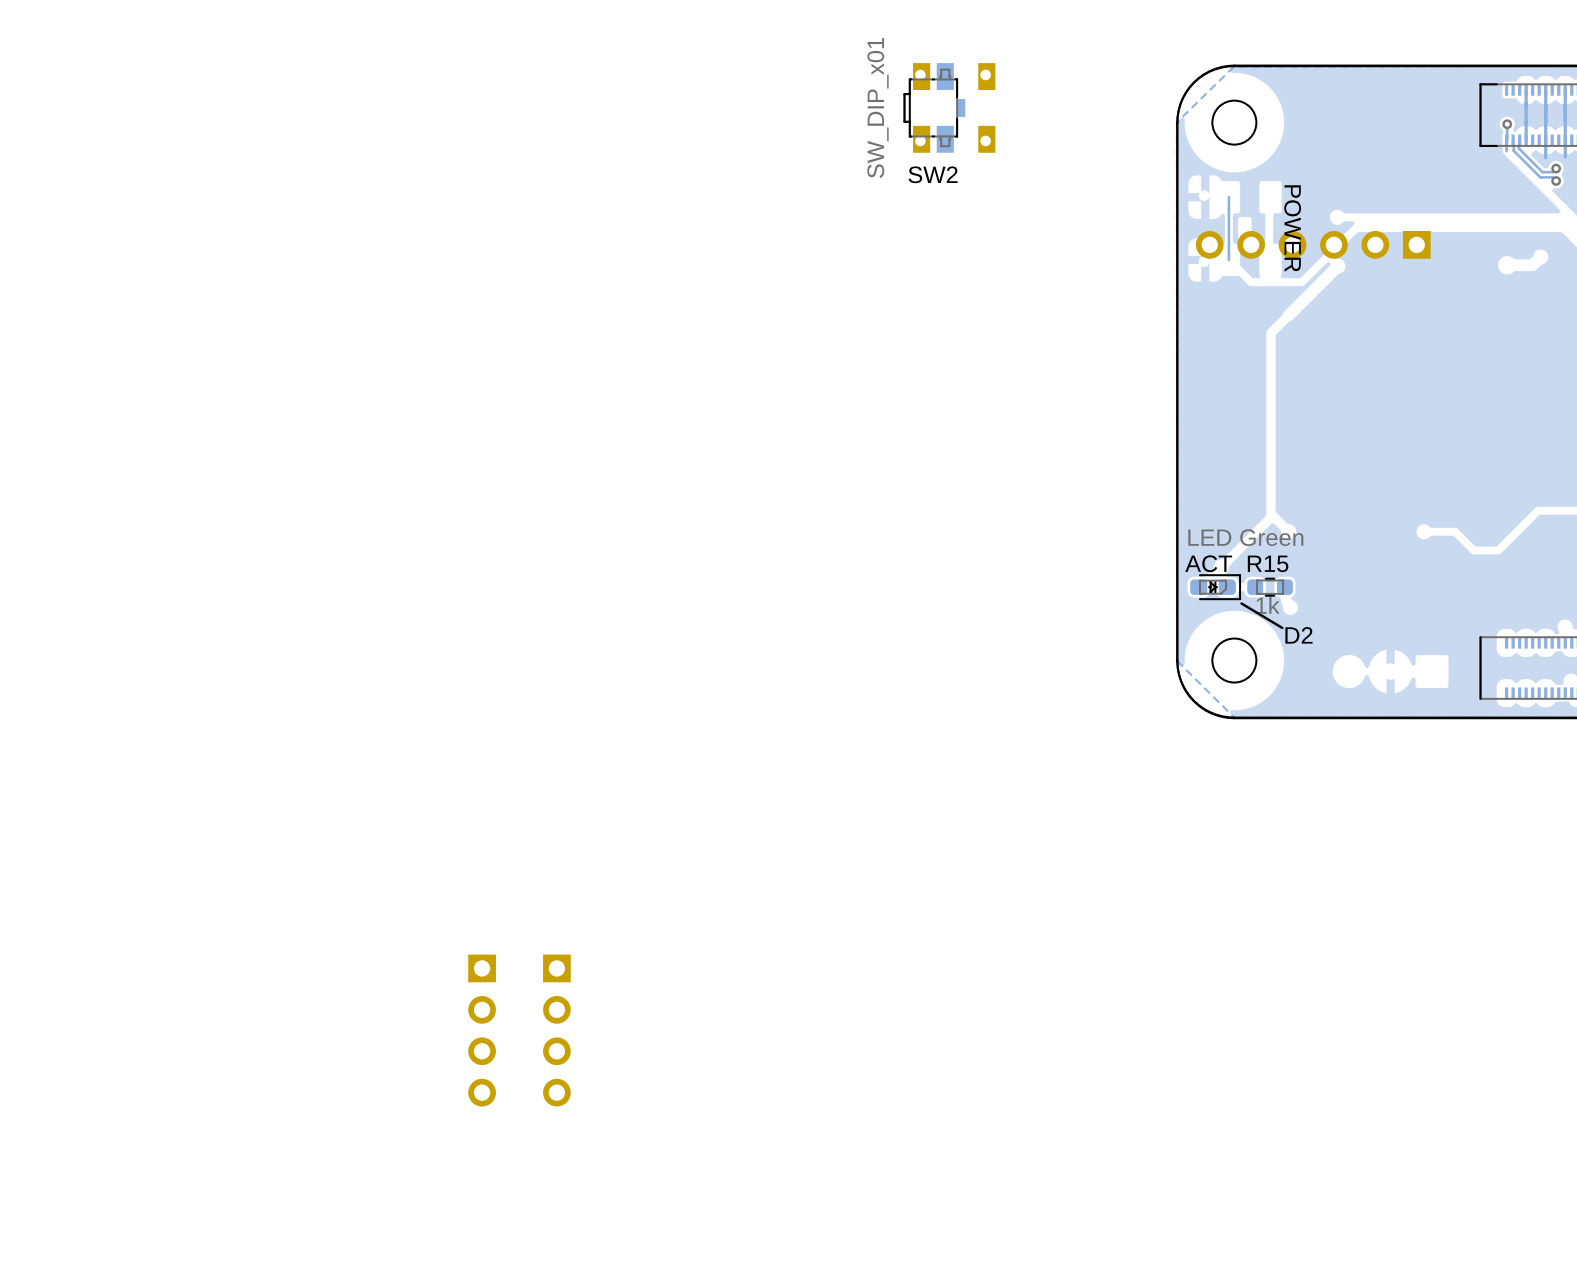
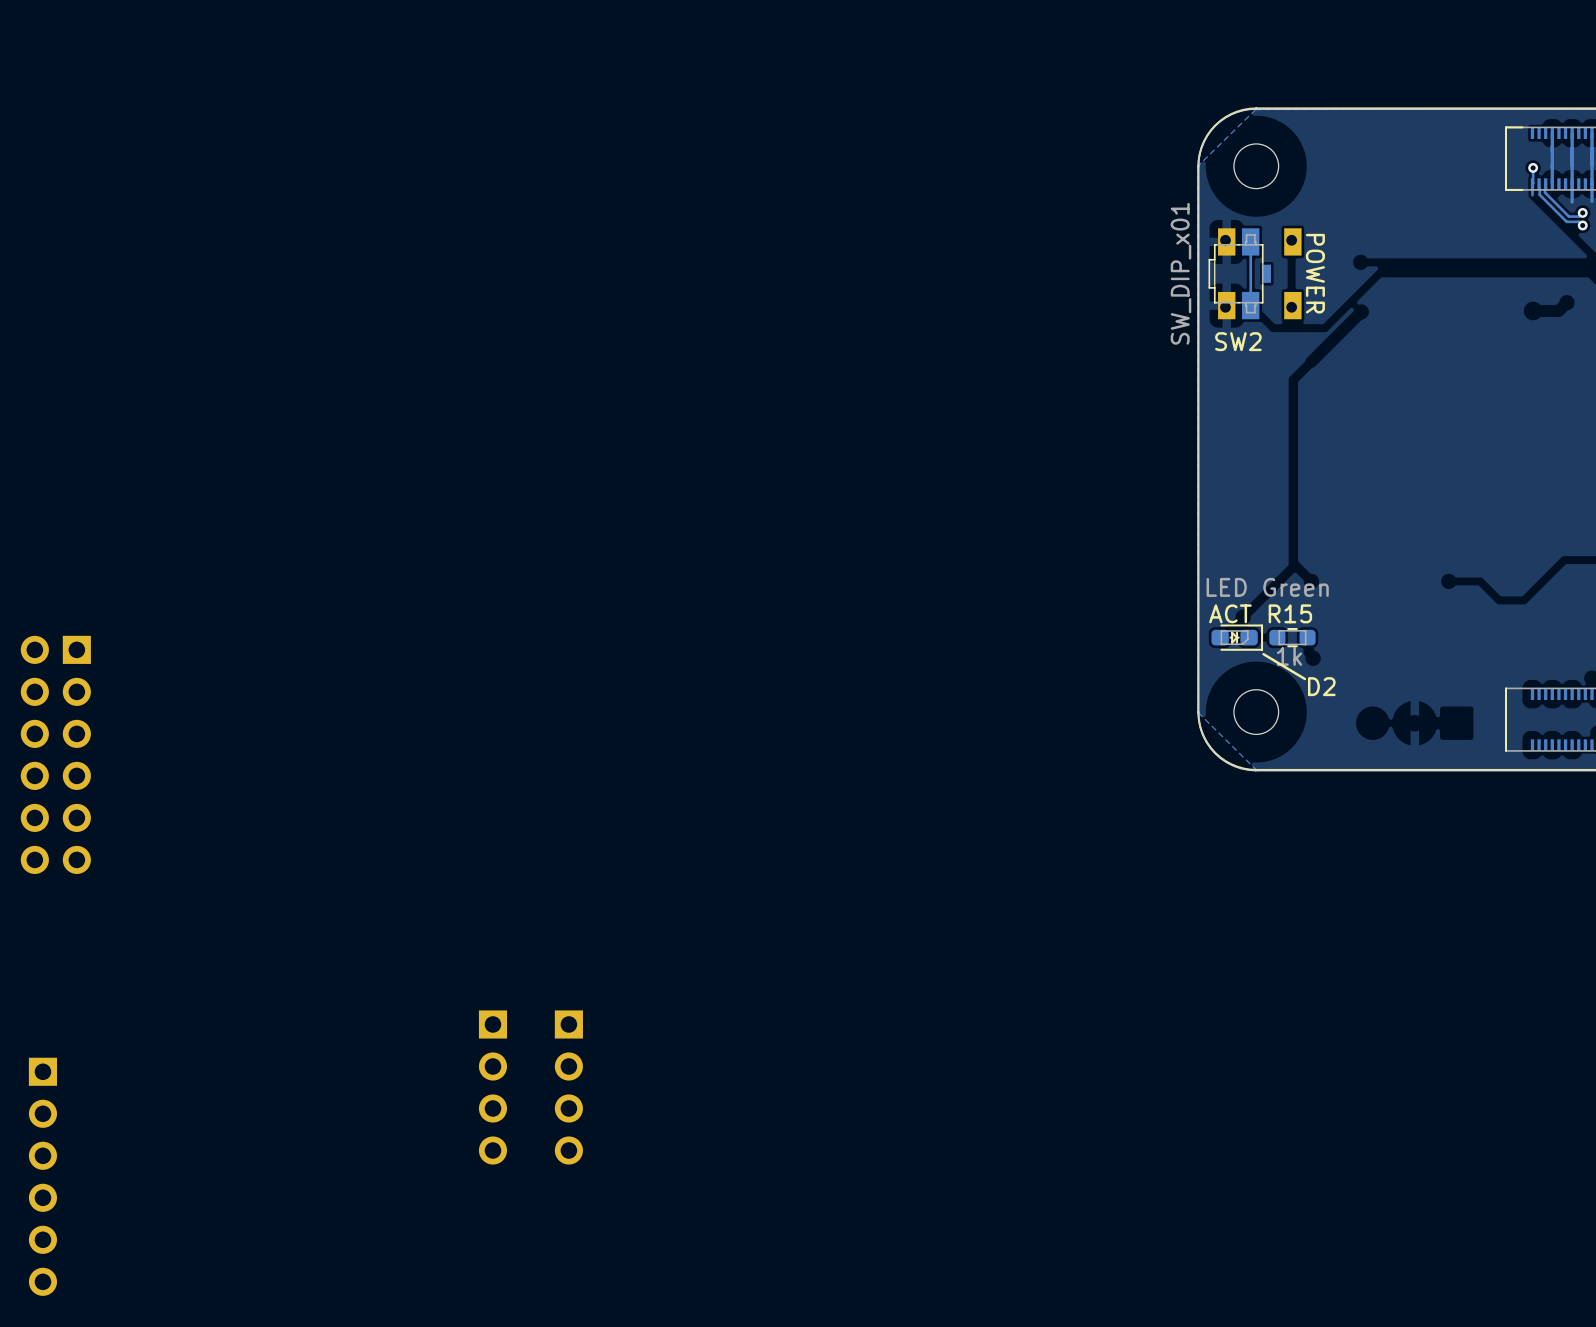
SW2 position: (934, 107) -> (1239, 273)
part position: (986, 107) -> (1292, 273)
part: (1313, 244) -> none
part: none -> (55, 754)
part: none -> (42, 1176)

